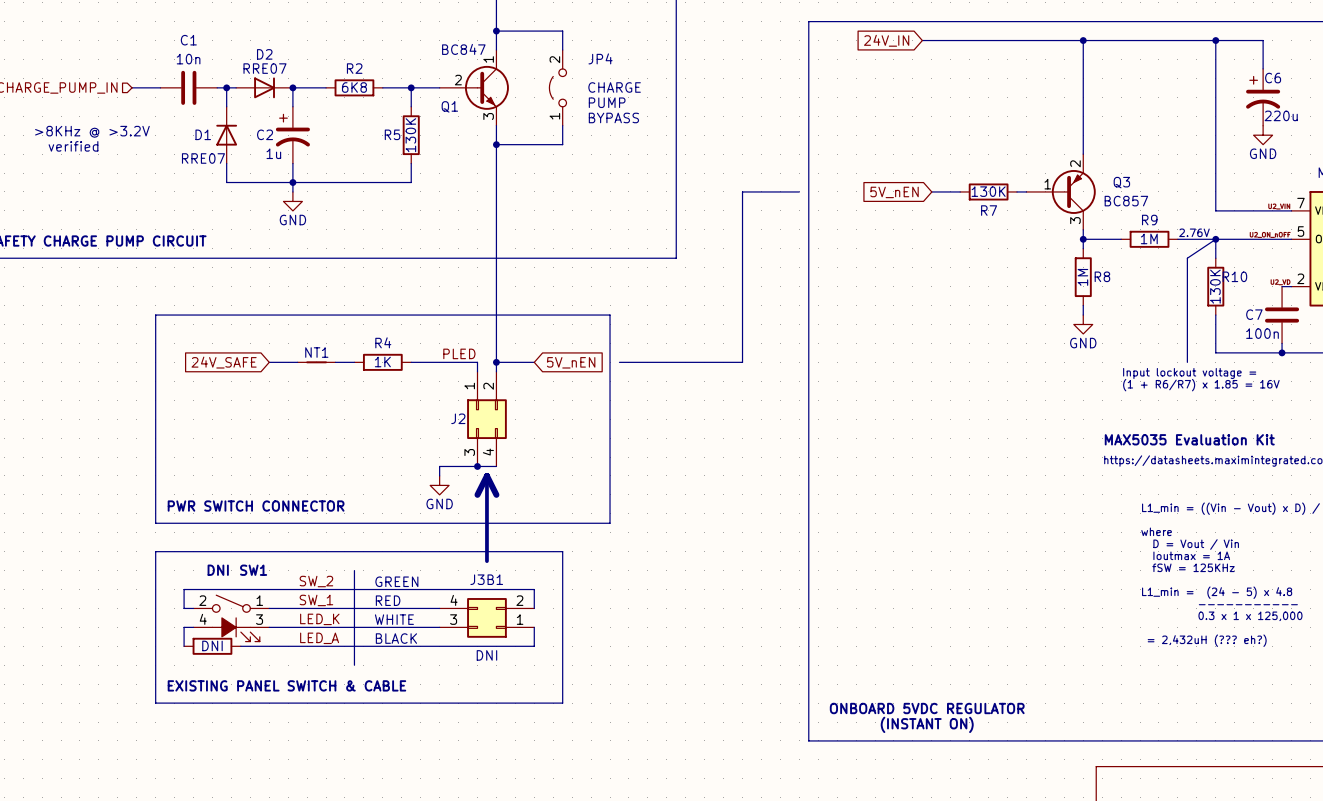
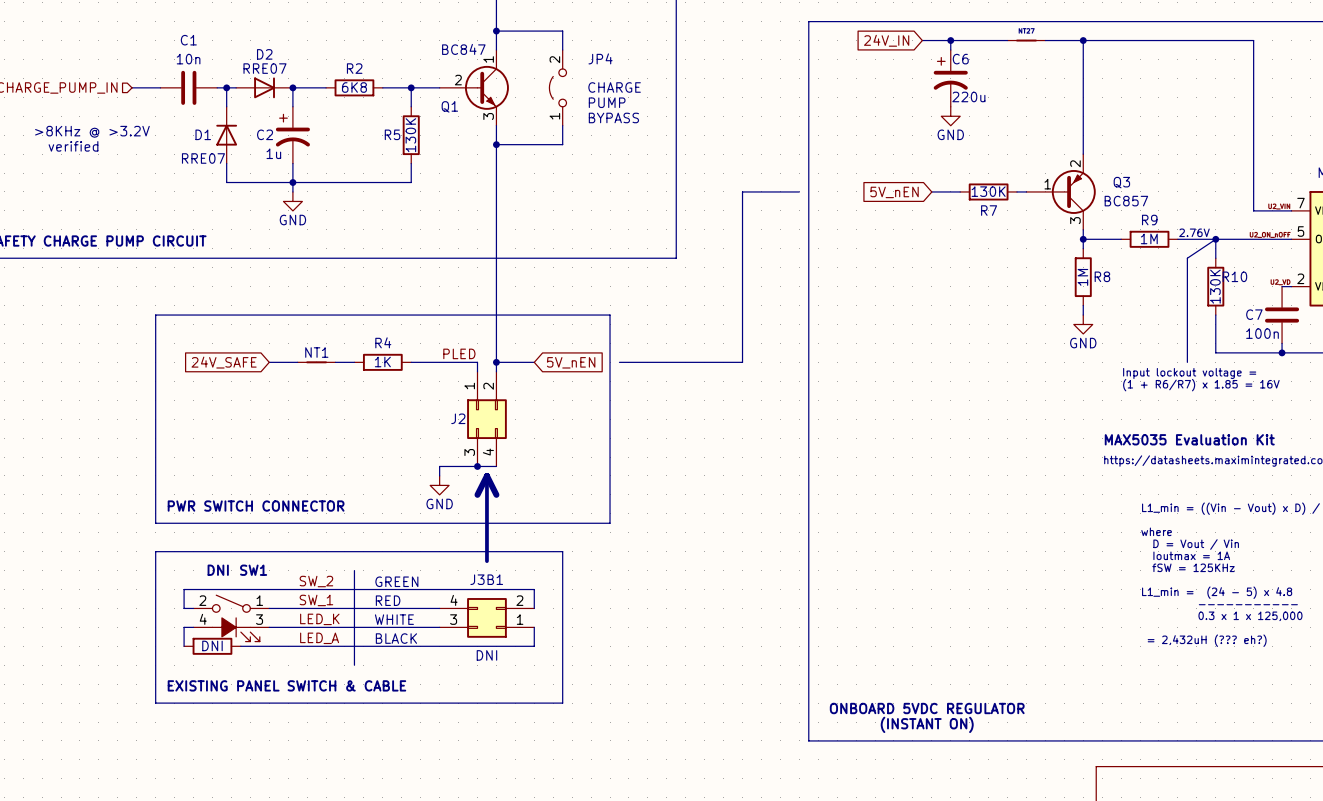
wire: none -> (950, 40) (950, 50)
junction: none -> (950, 40)
part: none -> (1026, 40)
wire: (1215, 40) (1215, 210) (1253, 210) -> (1253, 40) (1253, 210)
junction: (1215, 40) -> none
wire: (1253, 40) (1263, 40) (1263, 68) -> none
C6 position: (1263, 97) -> (950, 78)
power symbol: none -> GND (950, 116)
power symbol: GND (1263, 135) -> none

